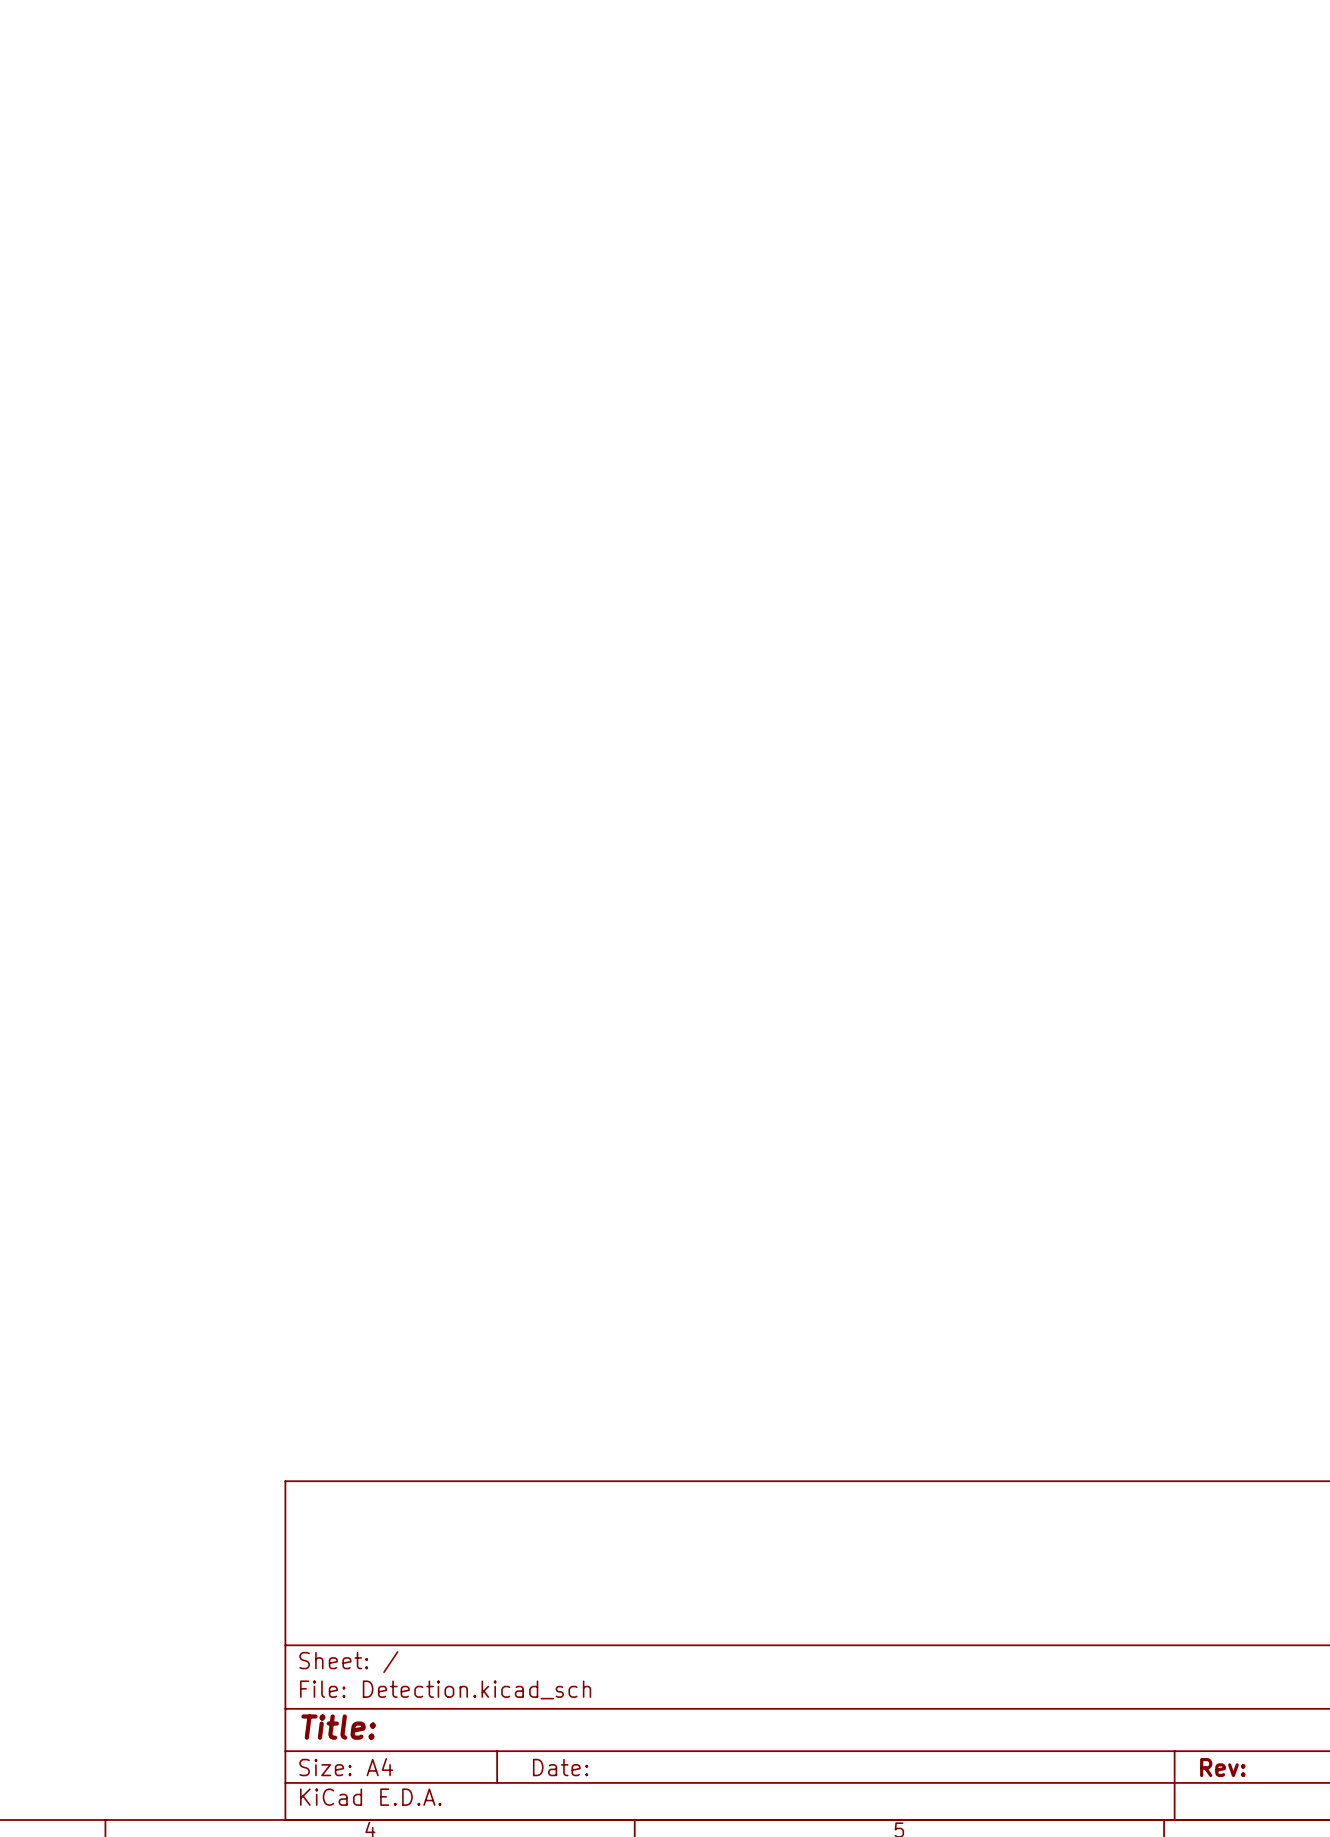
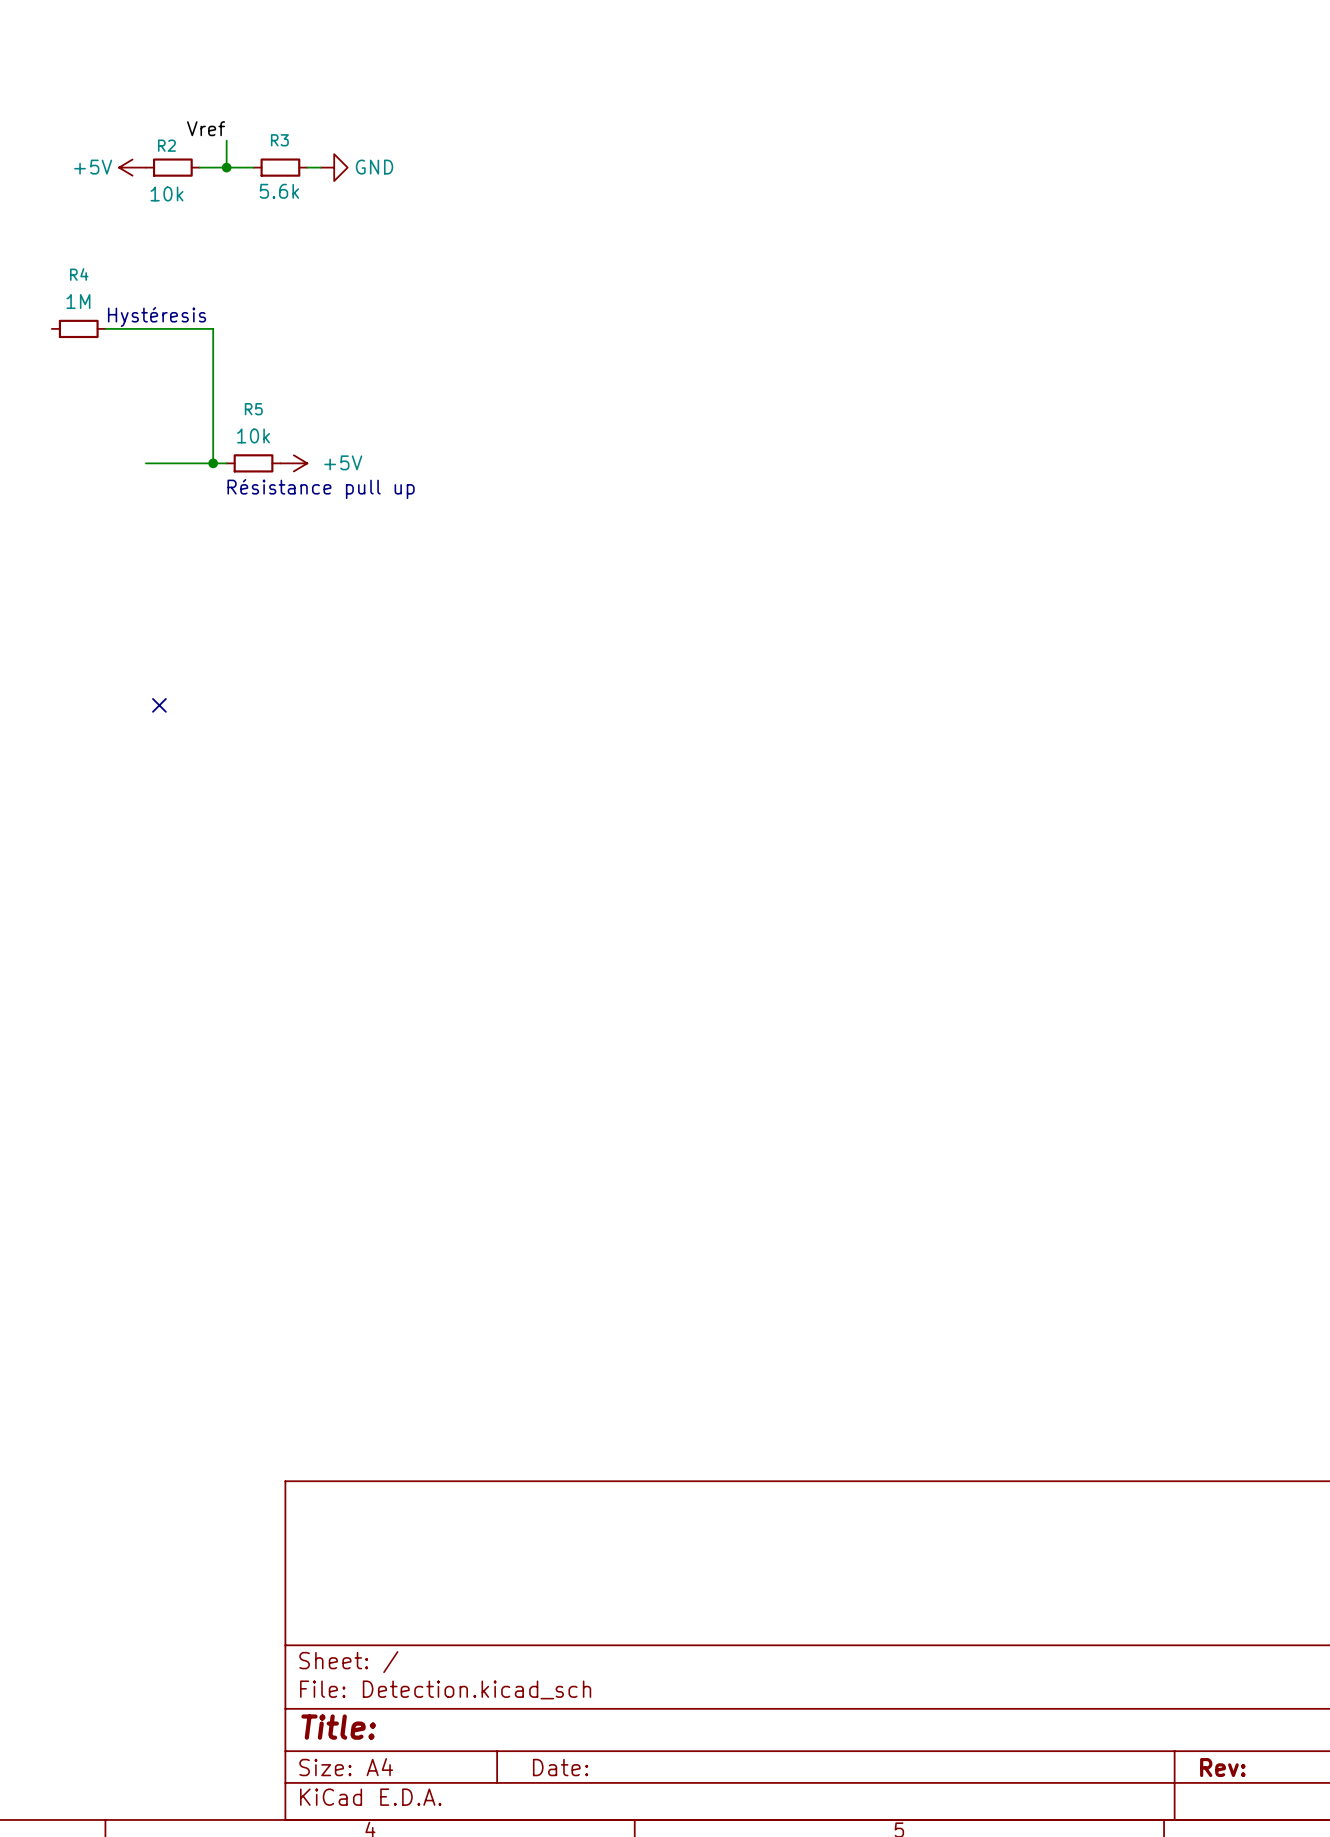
label: none -> Vref (206, 128)
wire: none -> (226, 140) (226, 167)
power symbol: none -> +5V (132, 167)
R2: none -> 10k (172, 167)
wire: none -> (199, 167) (253, 167)
junction: none -> (226, 167)
R3: none -> 5.6k (280, 167)
wire: none -> (307, 167) (320, 167)
power symbol: none -> GND (334, 167)
text: none -> Hystéresis (157, 316)
R4: none -> 1M (78, 328)
wire: none -> (105, 328) (213, 328) (213, 463)
wire: none -> (145, 463) (226, 463)
junction: none -> (213, 463)
R5: none -> 10k (253, 463)
power symbol: none -> +5V (293, 463)
text: none -> Résistance pull up (321, 489)
no-connect mark: none -> (159, 705)

